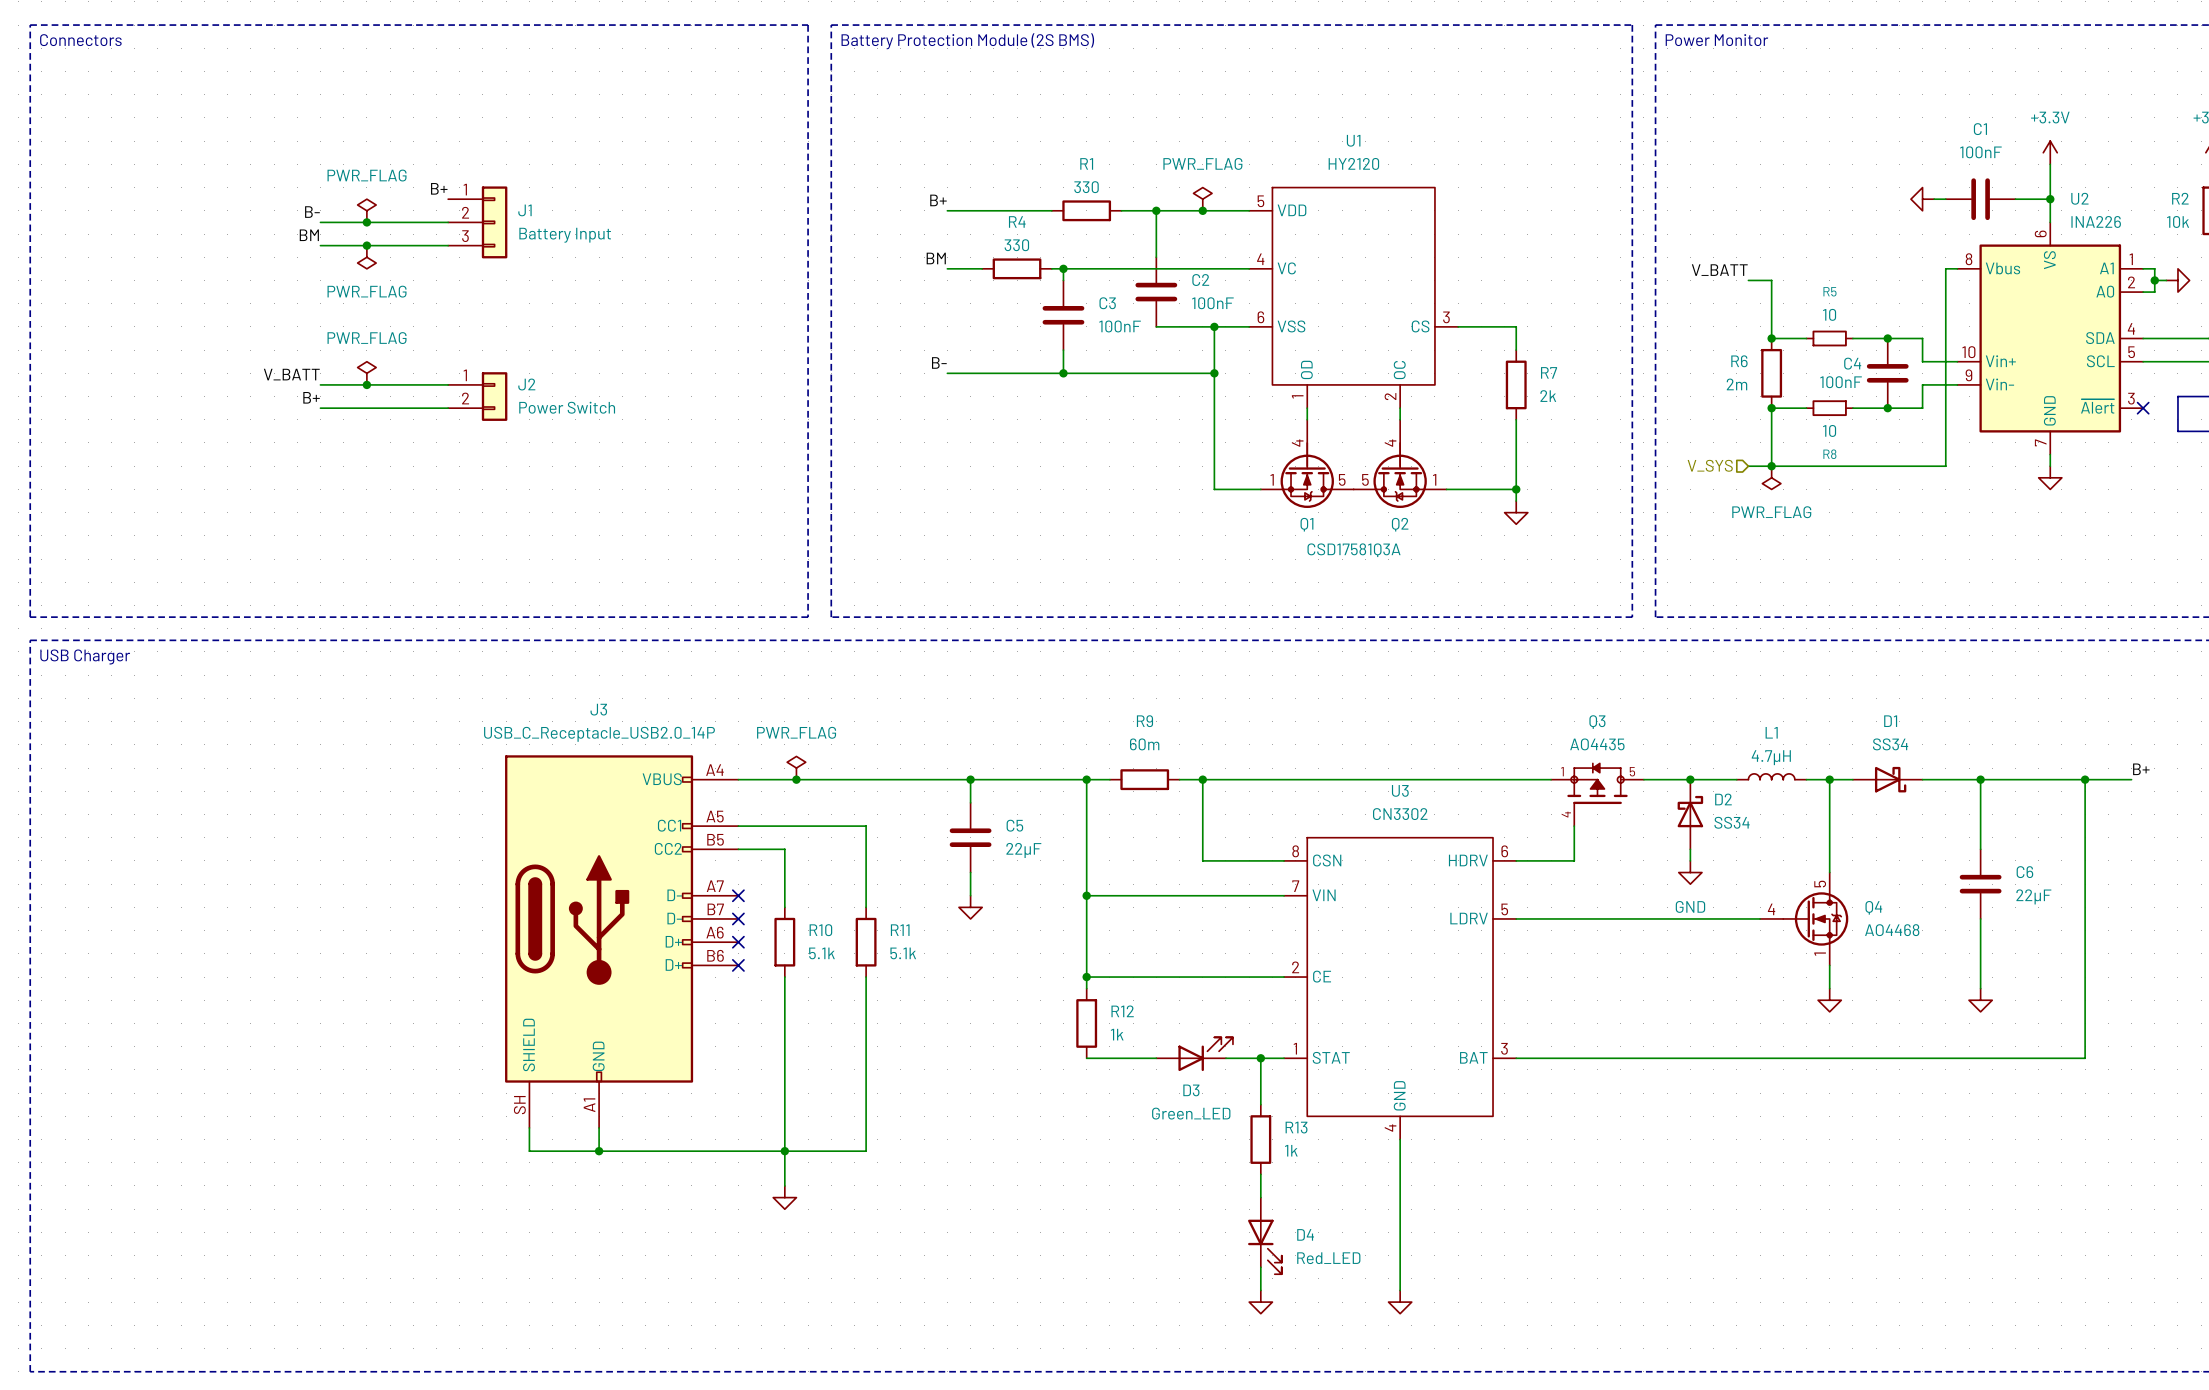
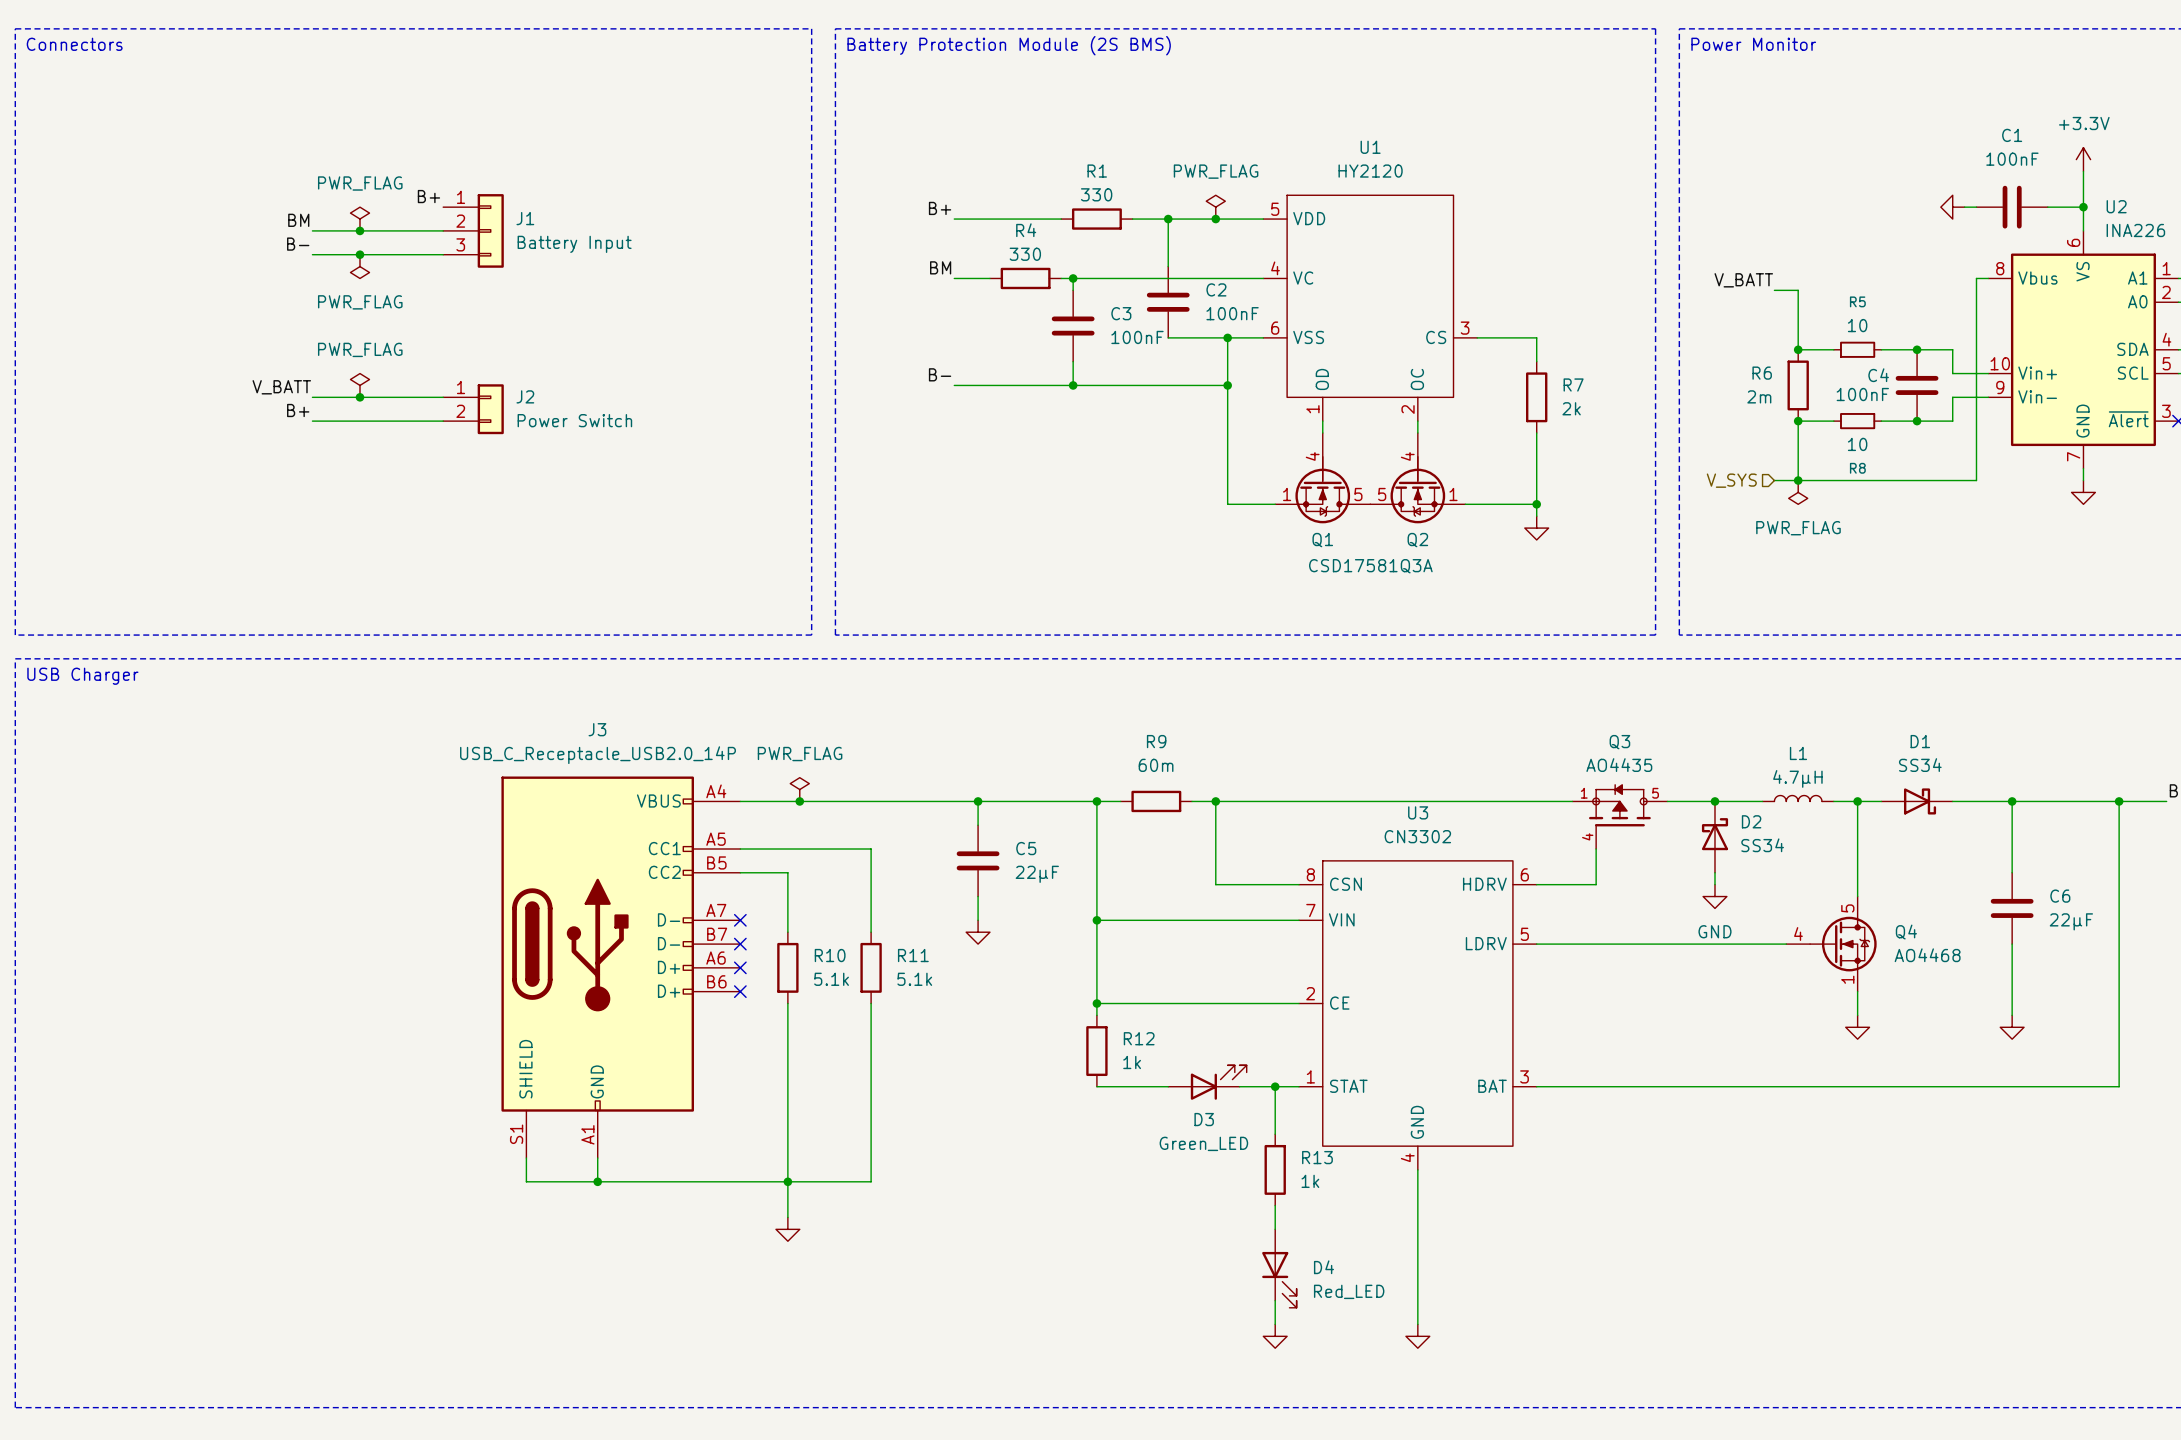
label: B- (312, 212) -> BM (298, 220)
label: BM (309, 235) -> B- (298, 244)
J3 pin number: SH (519, 1105) -> S1 (516, 1134)

